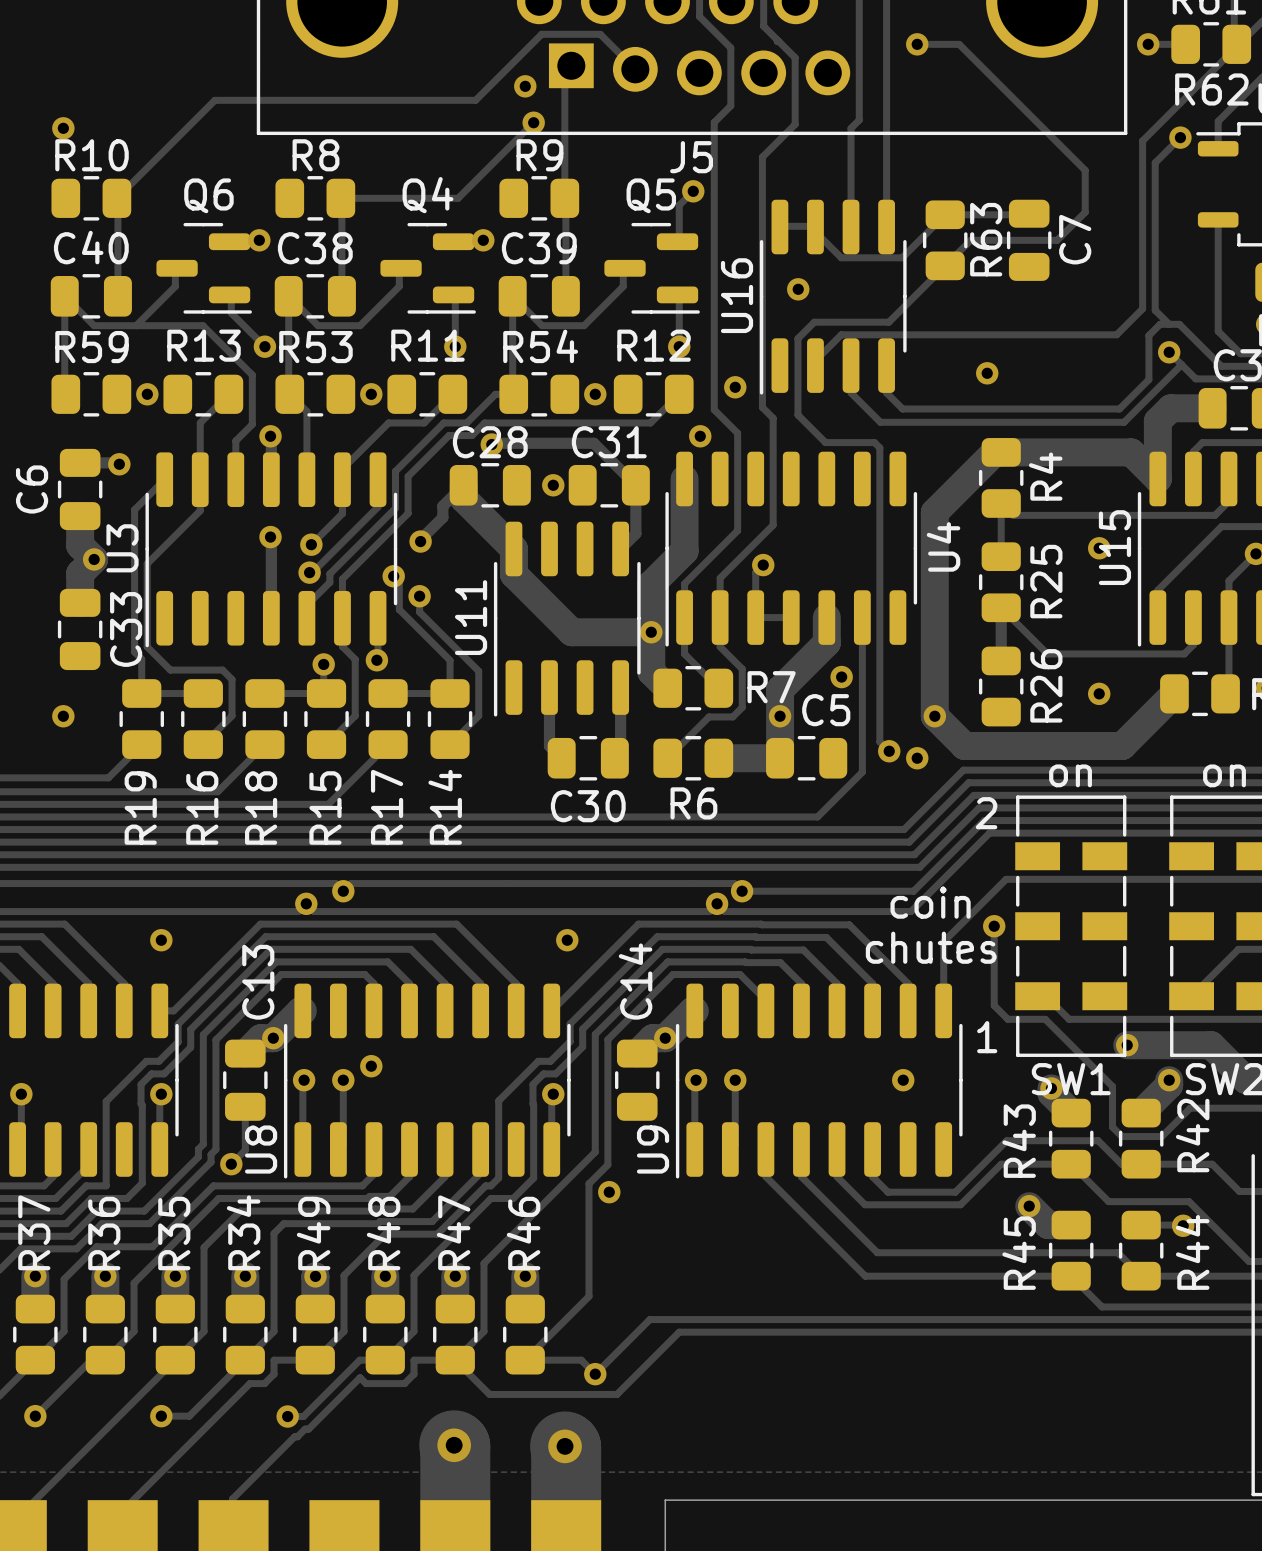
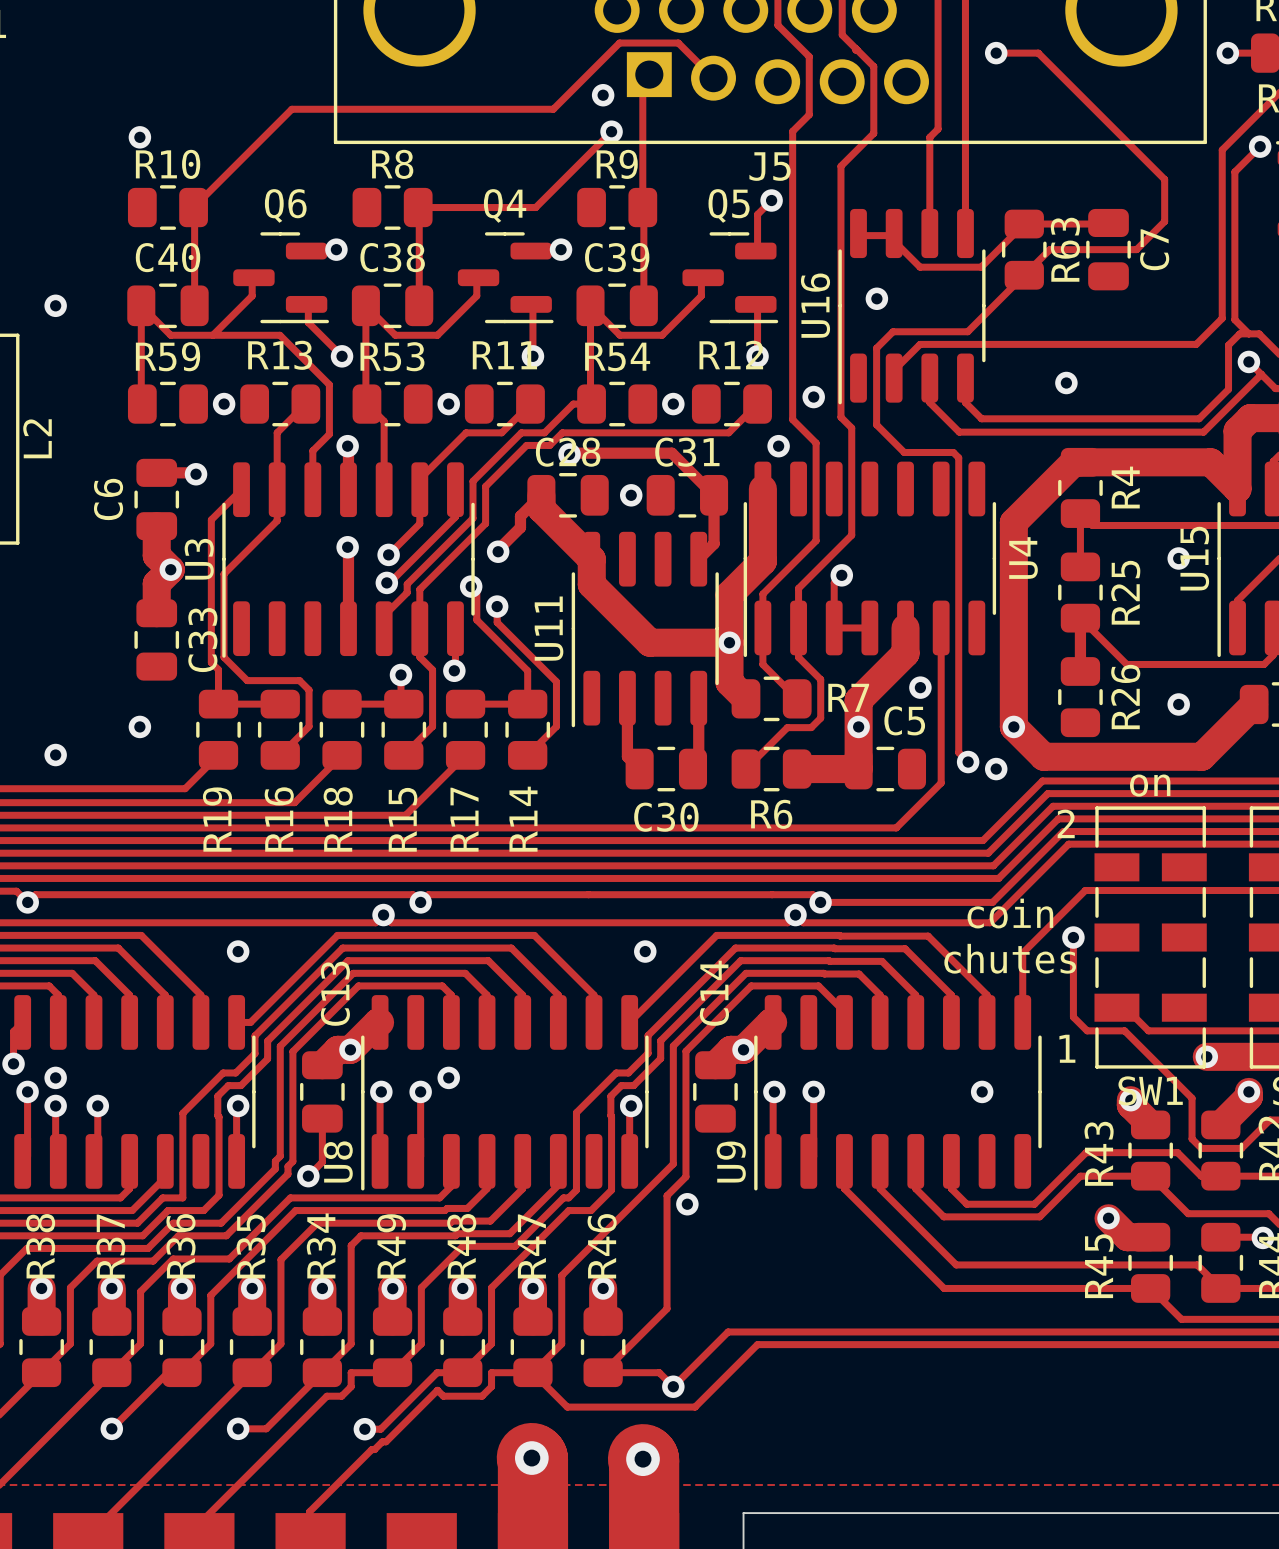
U16 footprint: [759, 199, 907, 395] -> [838, 208, 986, 405]

